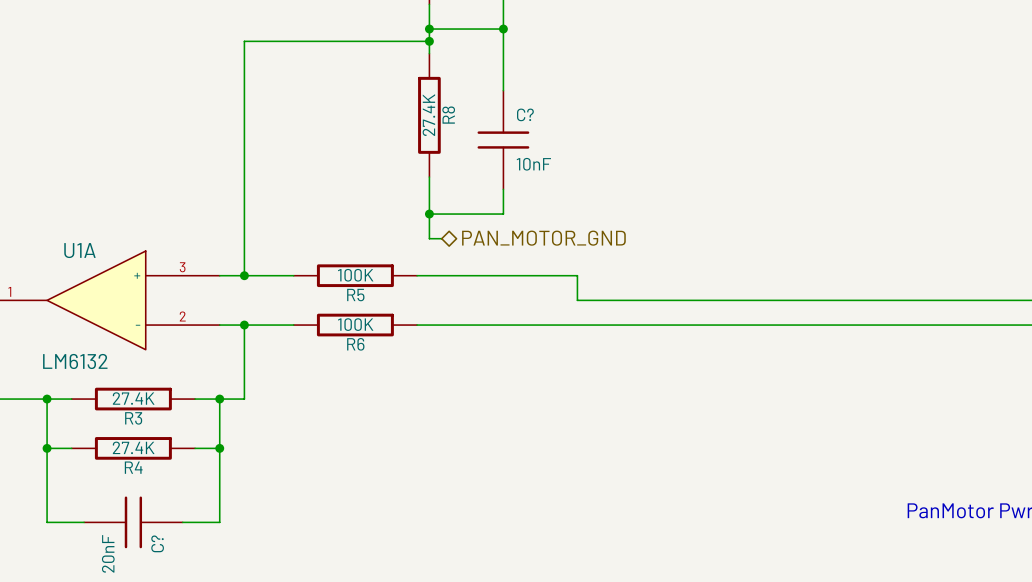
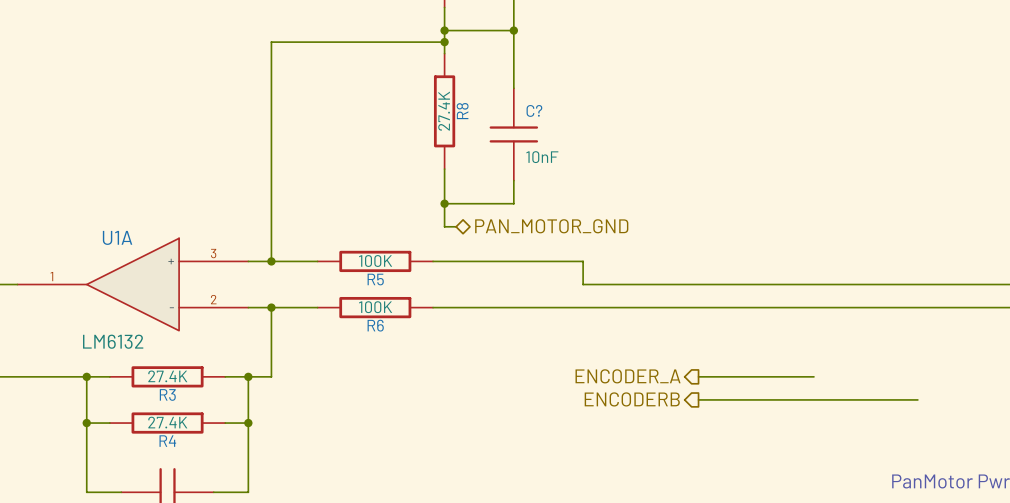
hierarchical label: none -> ENCODER_A (628, 376)
wire: none -> (698, 376) (813, 376)
hierarchical label: none -> ENCODERB (632, 399)
wire: none -> (698, 399) (917, 399)

